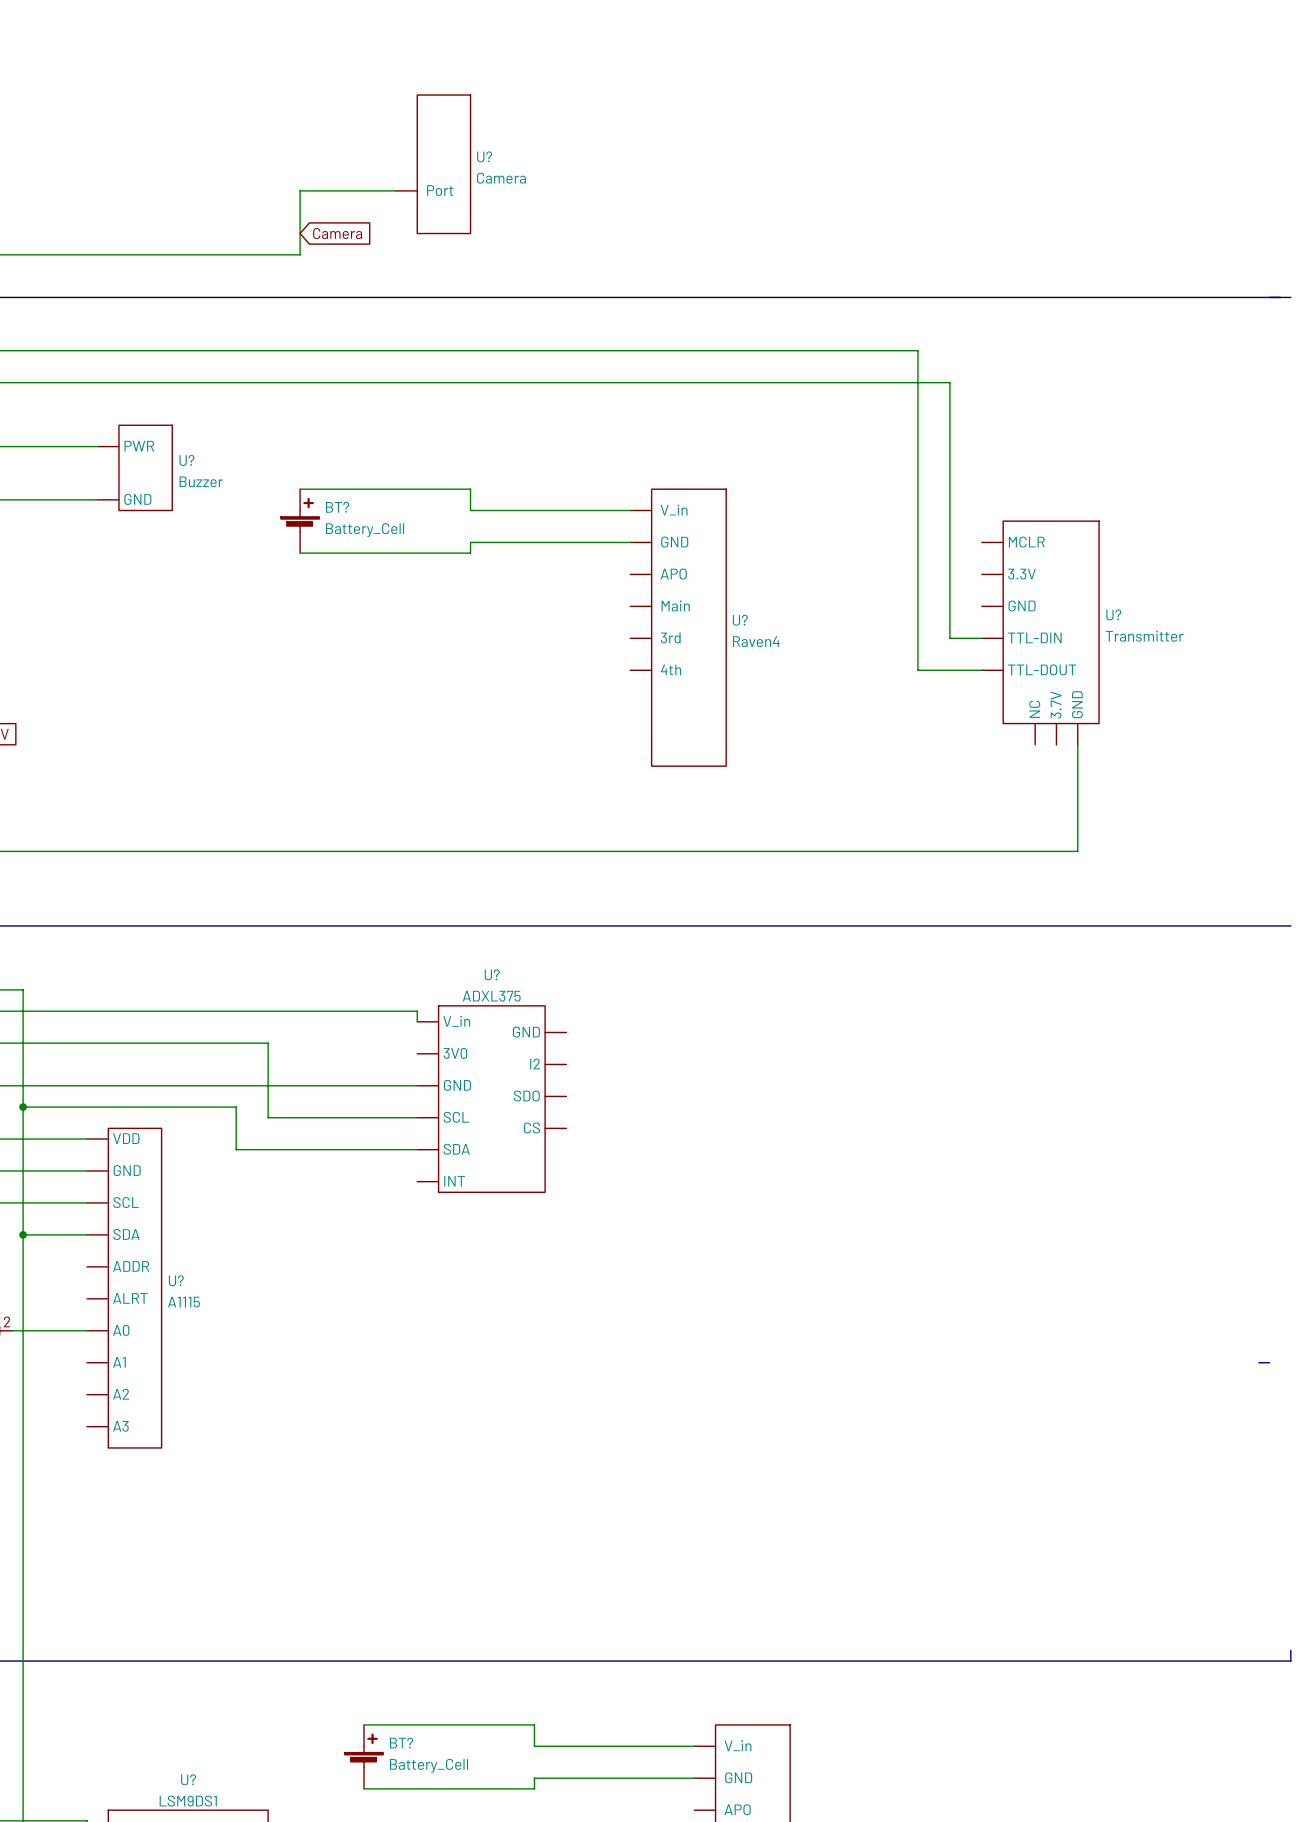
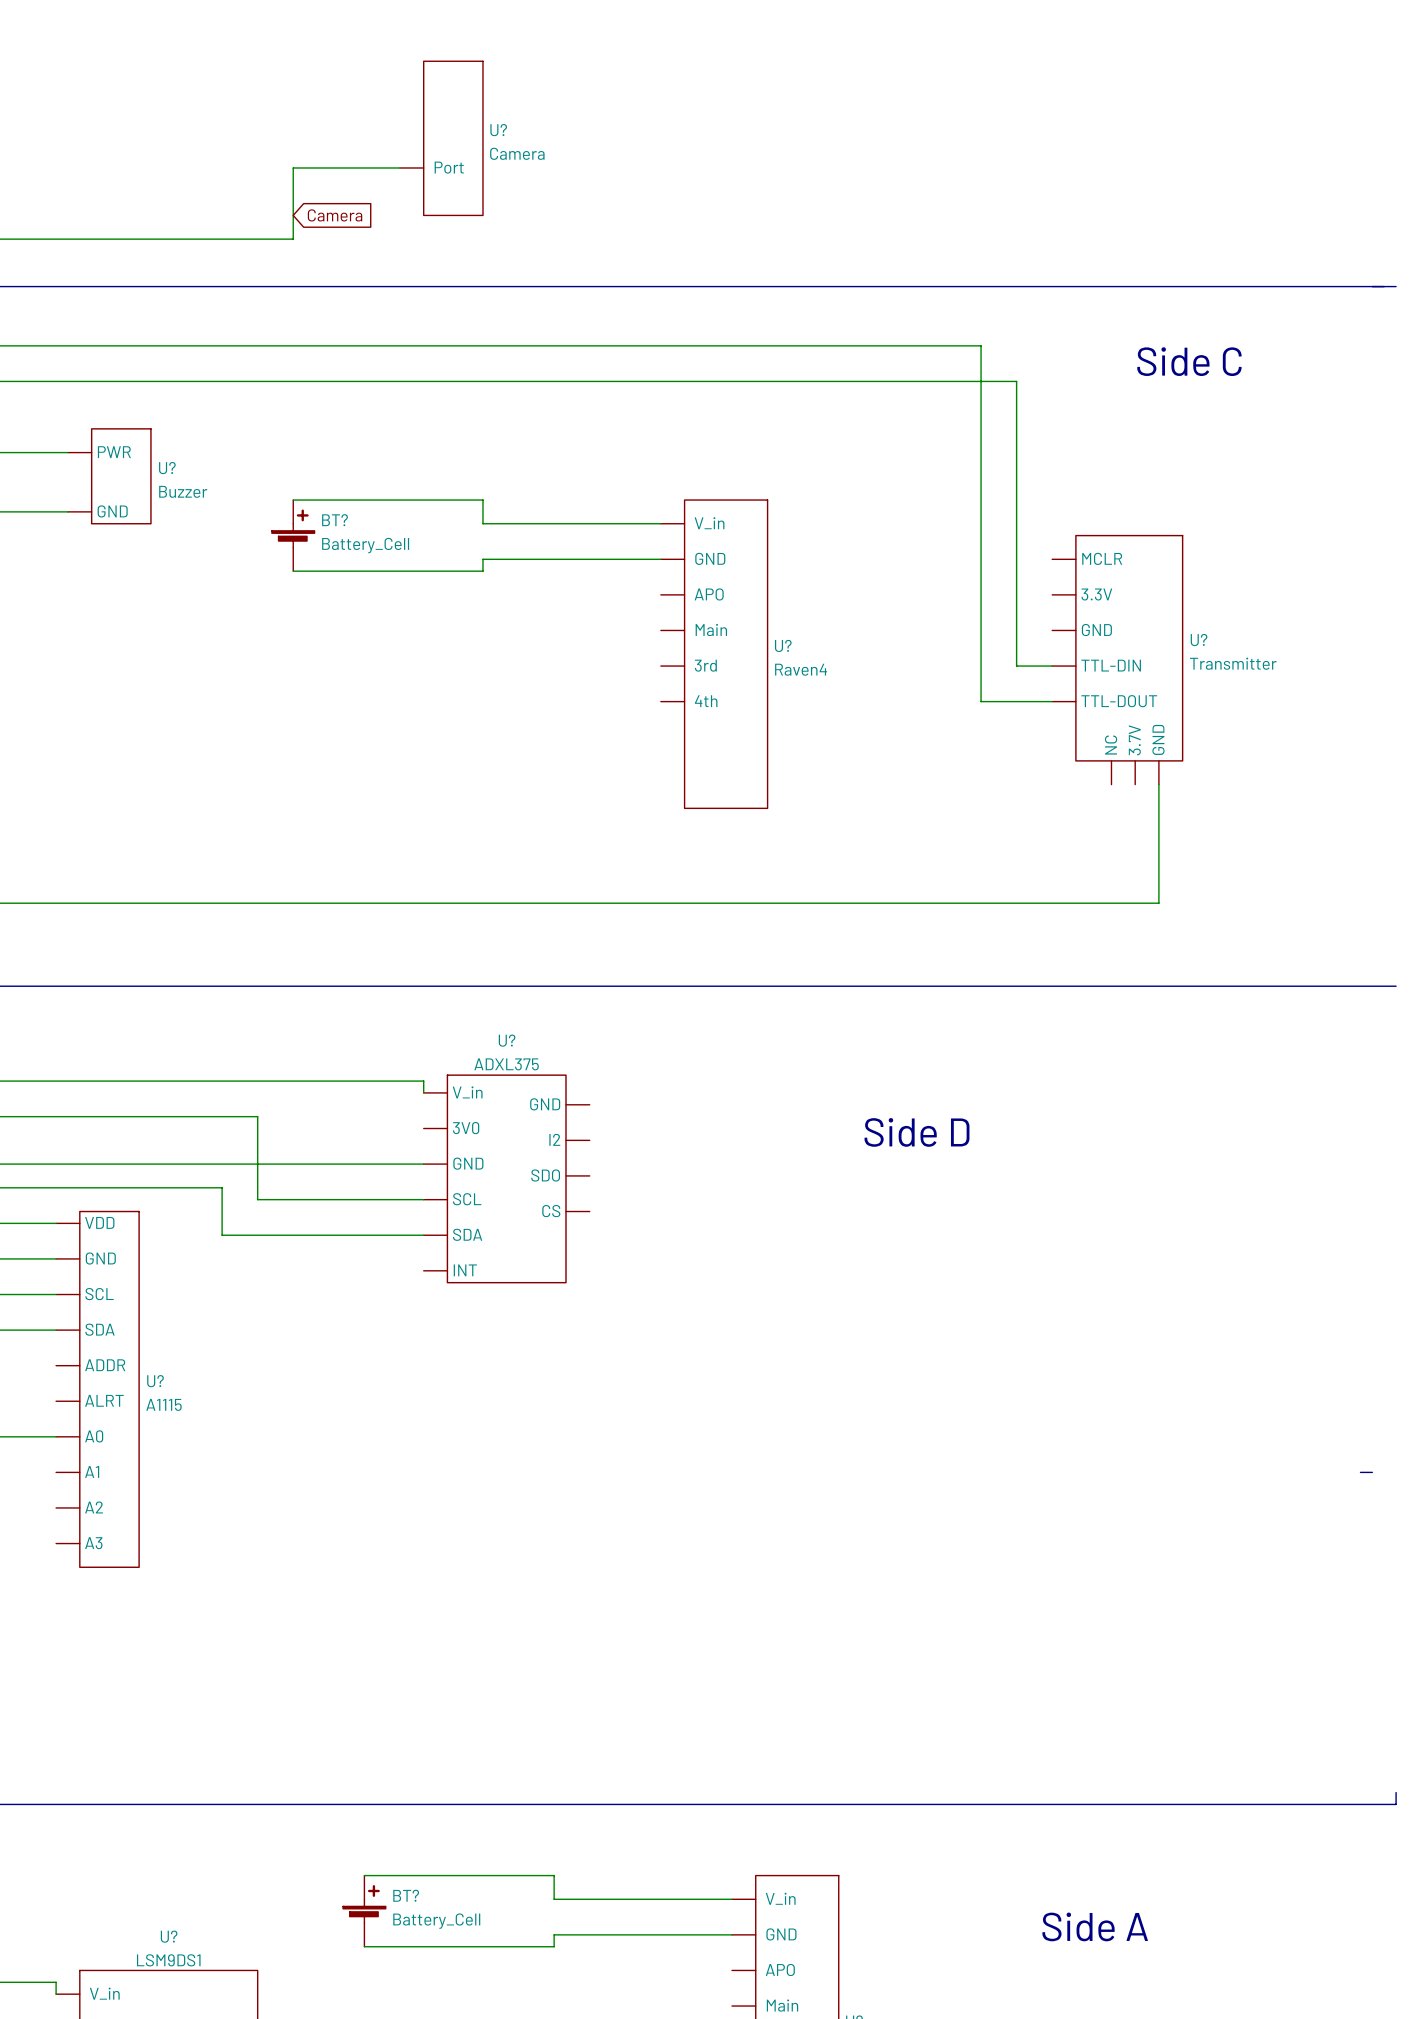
text: none -> Side C (1189, 361)
text: none -> Side D (916, 1132)
text: none -> Side A (1095, 1926)

